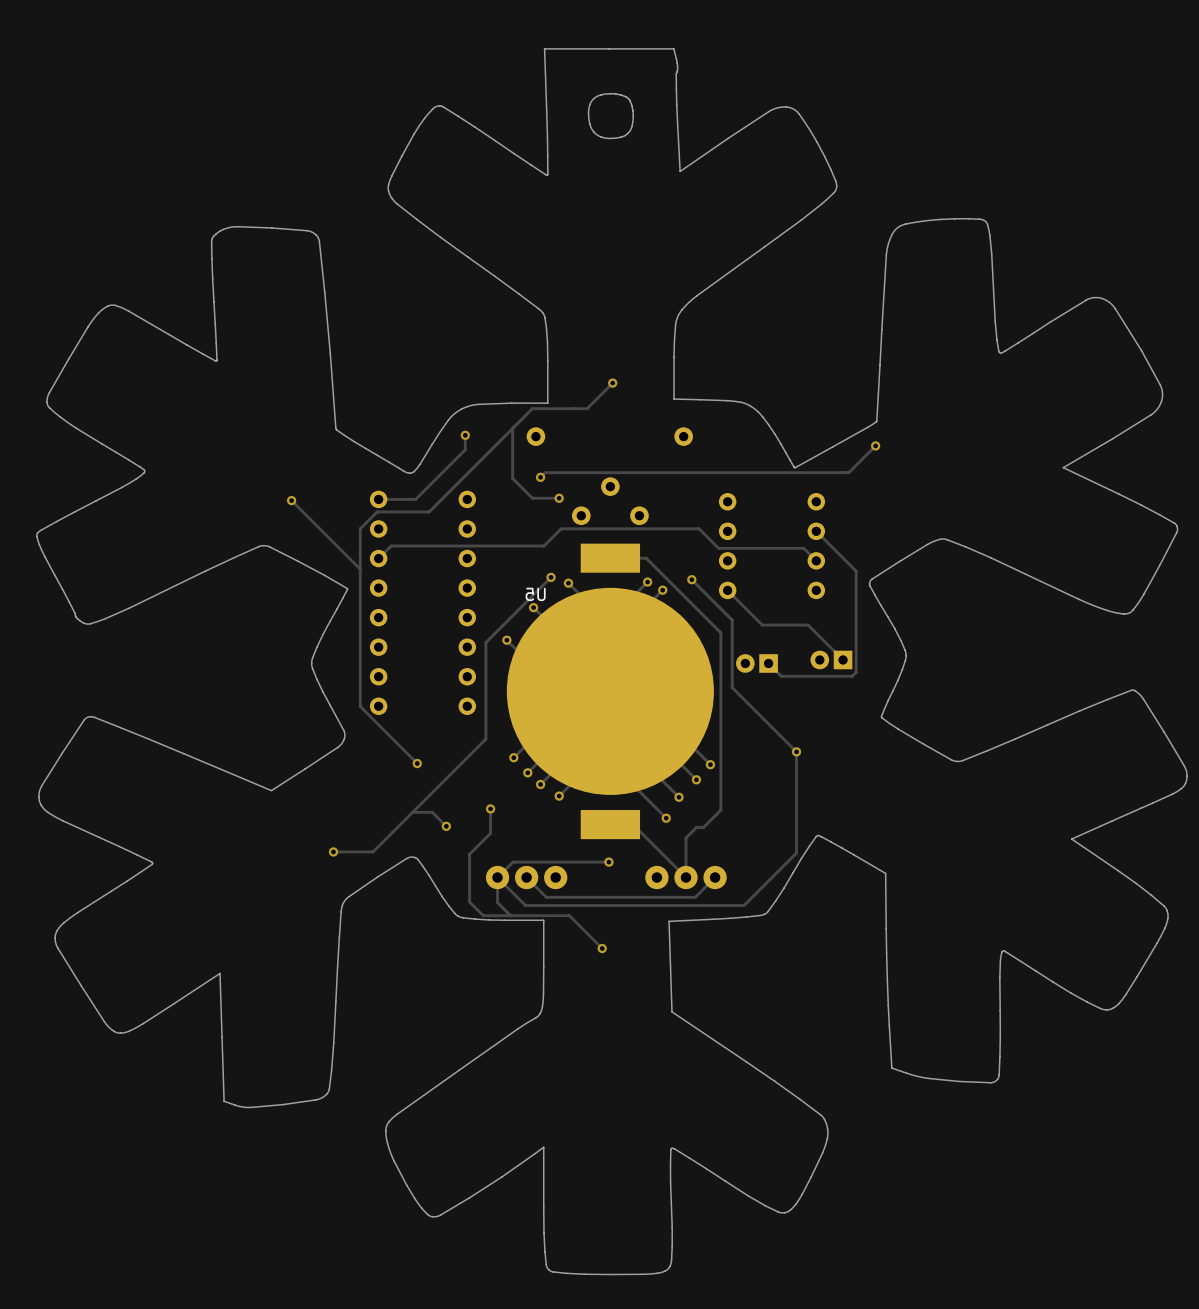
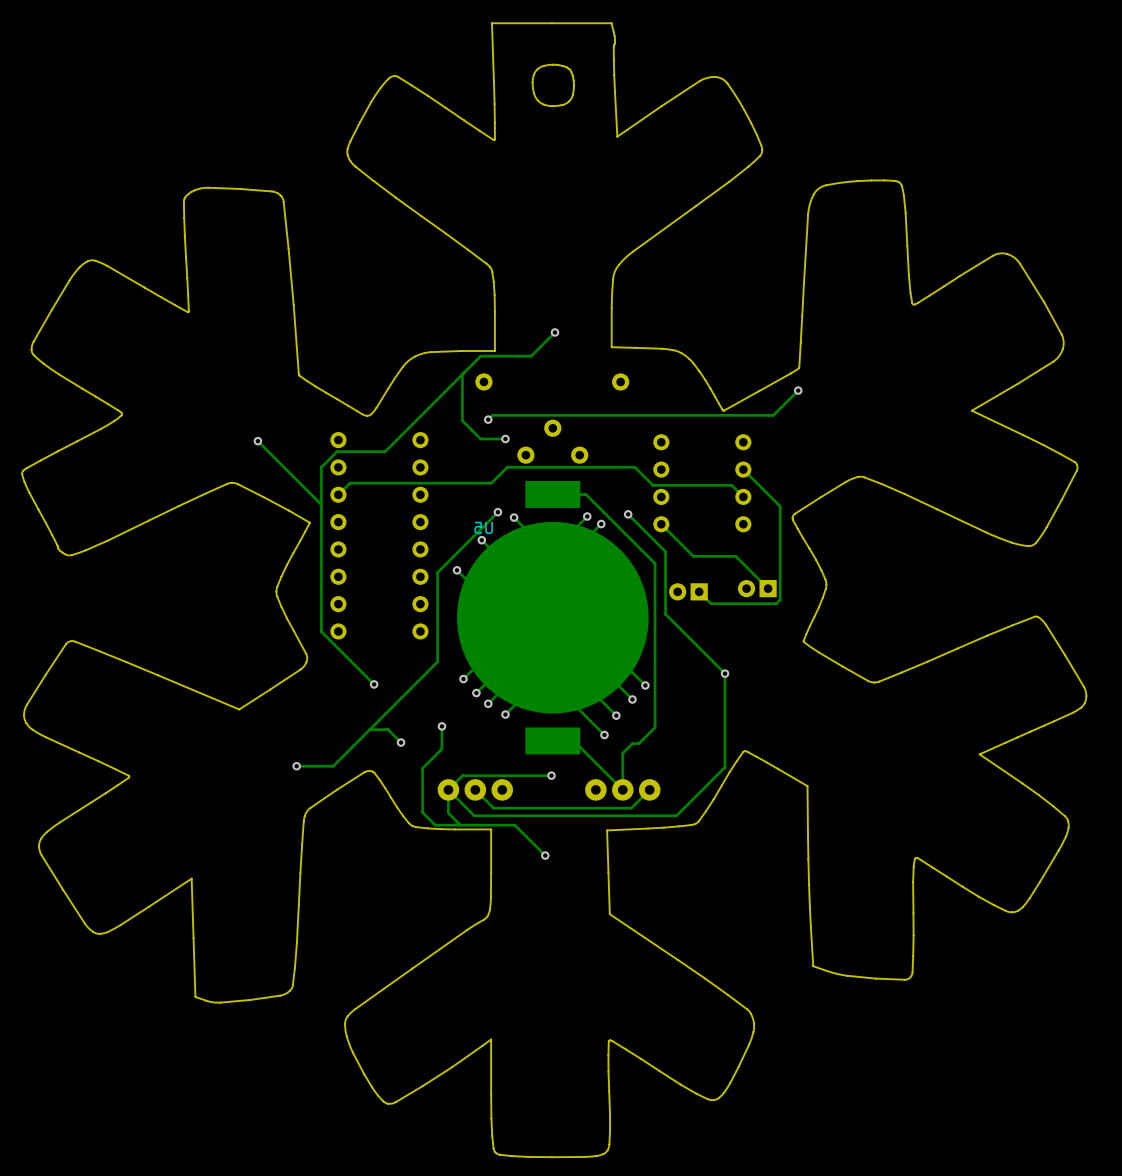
track: (465, 435) (465, 449) (415, 499) (378, 499) -> none
via: (465, 435) -> none

